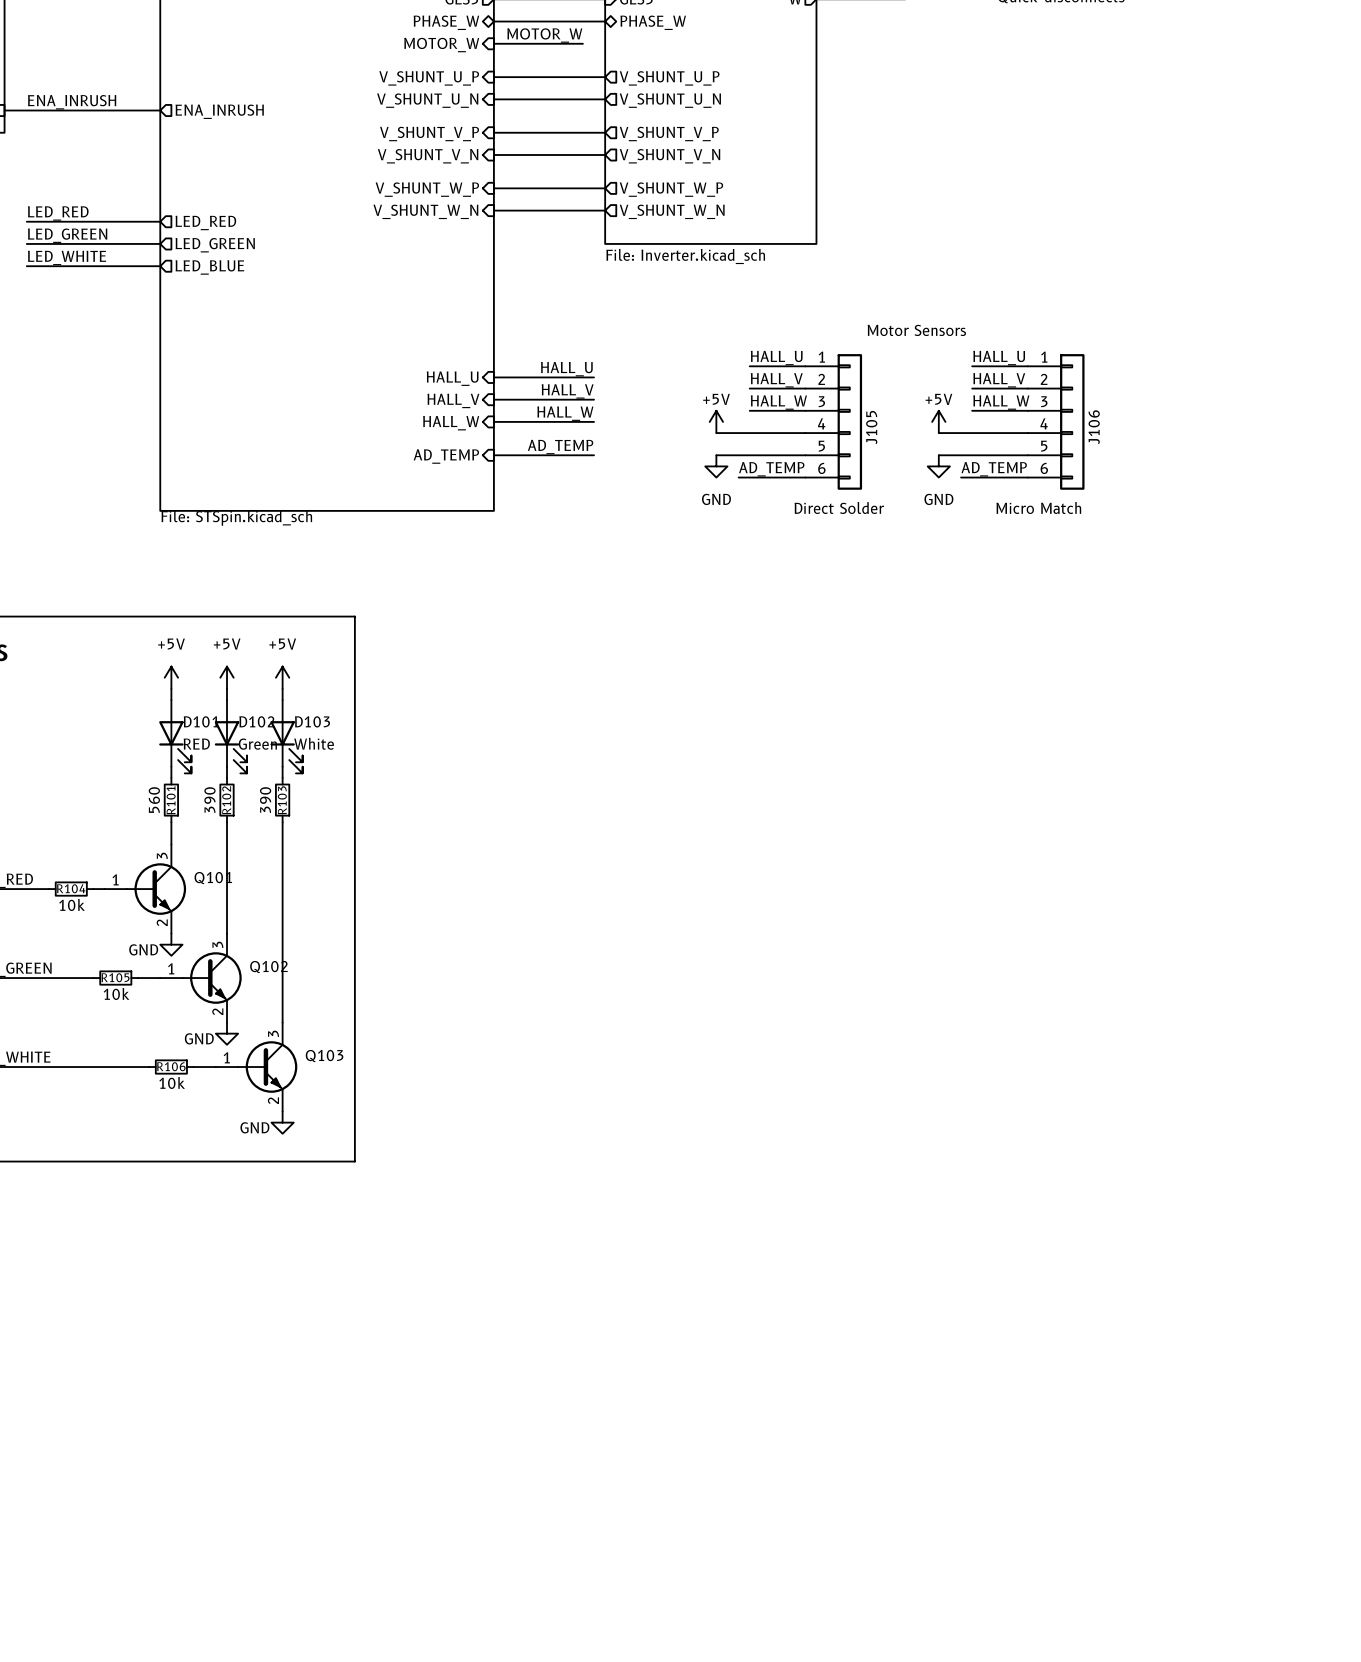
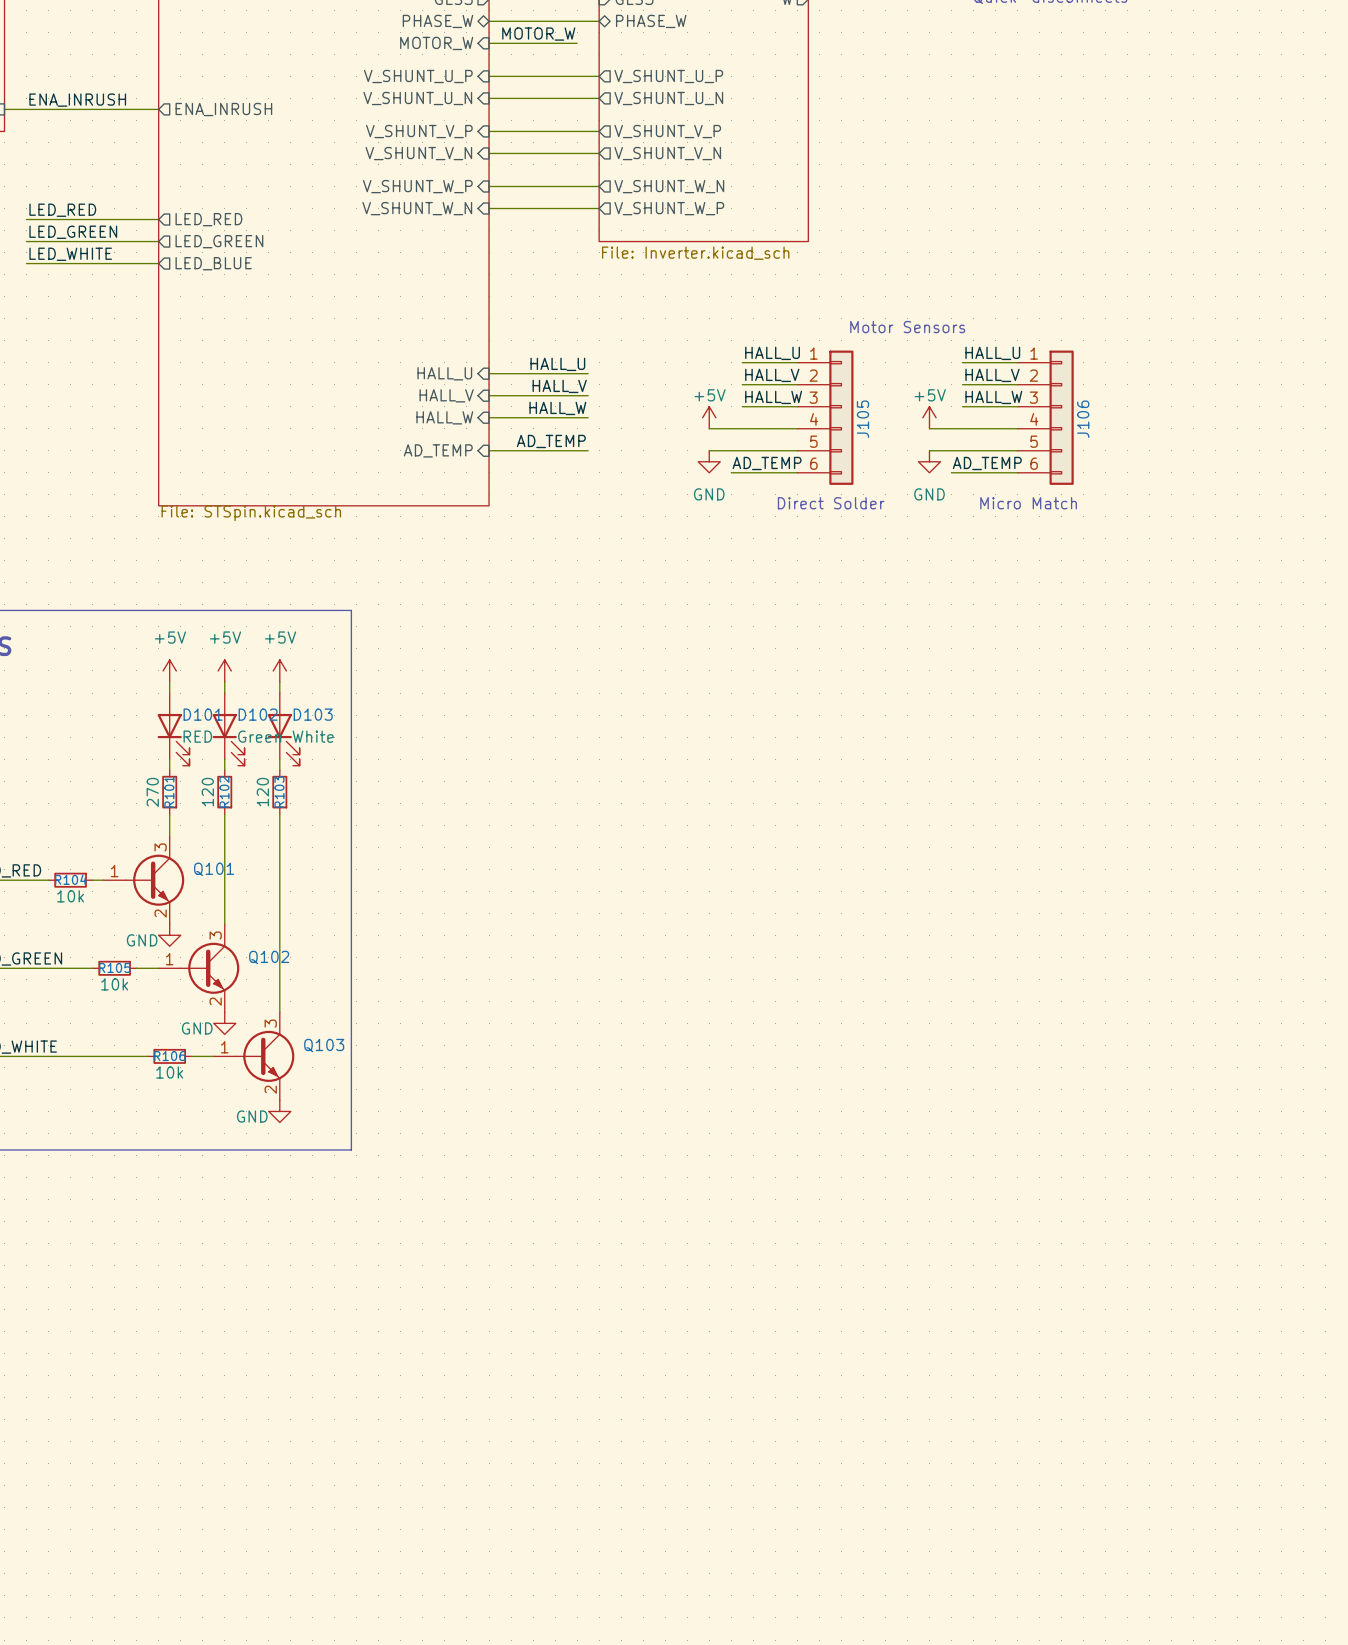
sheet pin: V_SHUNT_W_P (671, 189) -> V_SHUNT_W_N (669, 186)
sheet pin: V_SHUNT_W_N (672, 211) -> V_SHUNT_W_P (669, 208)
R101 value: 560 (154, 800) -> 270 (152, 792)
R102 value: 390 (209, 800) -> 120 (207, 792)
R103 value: 390 (265, 800) -> 120 (262, 792)

